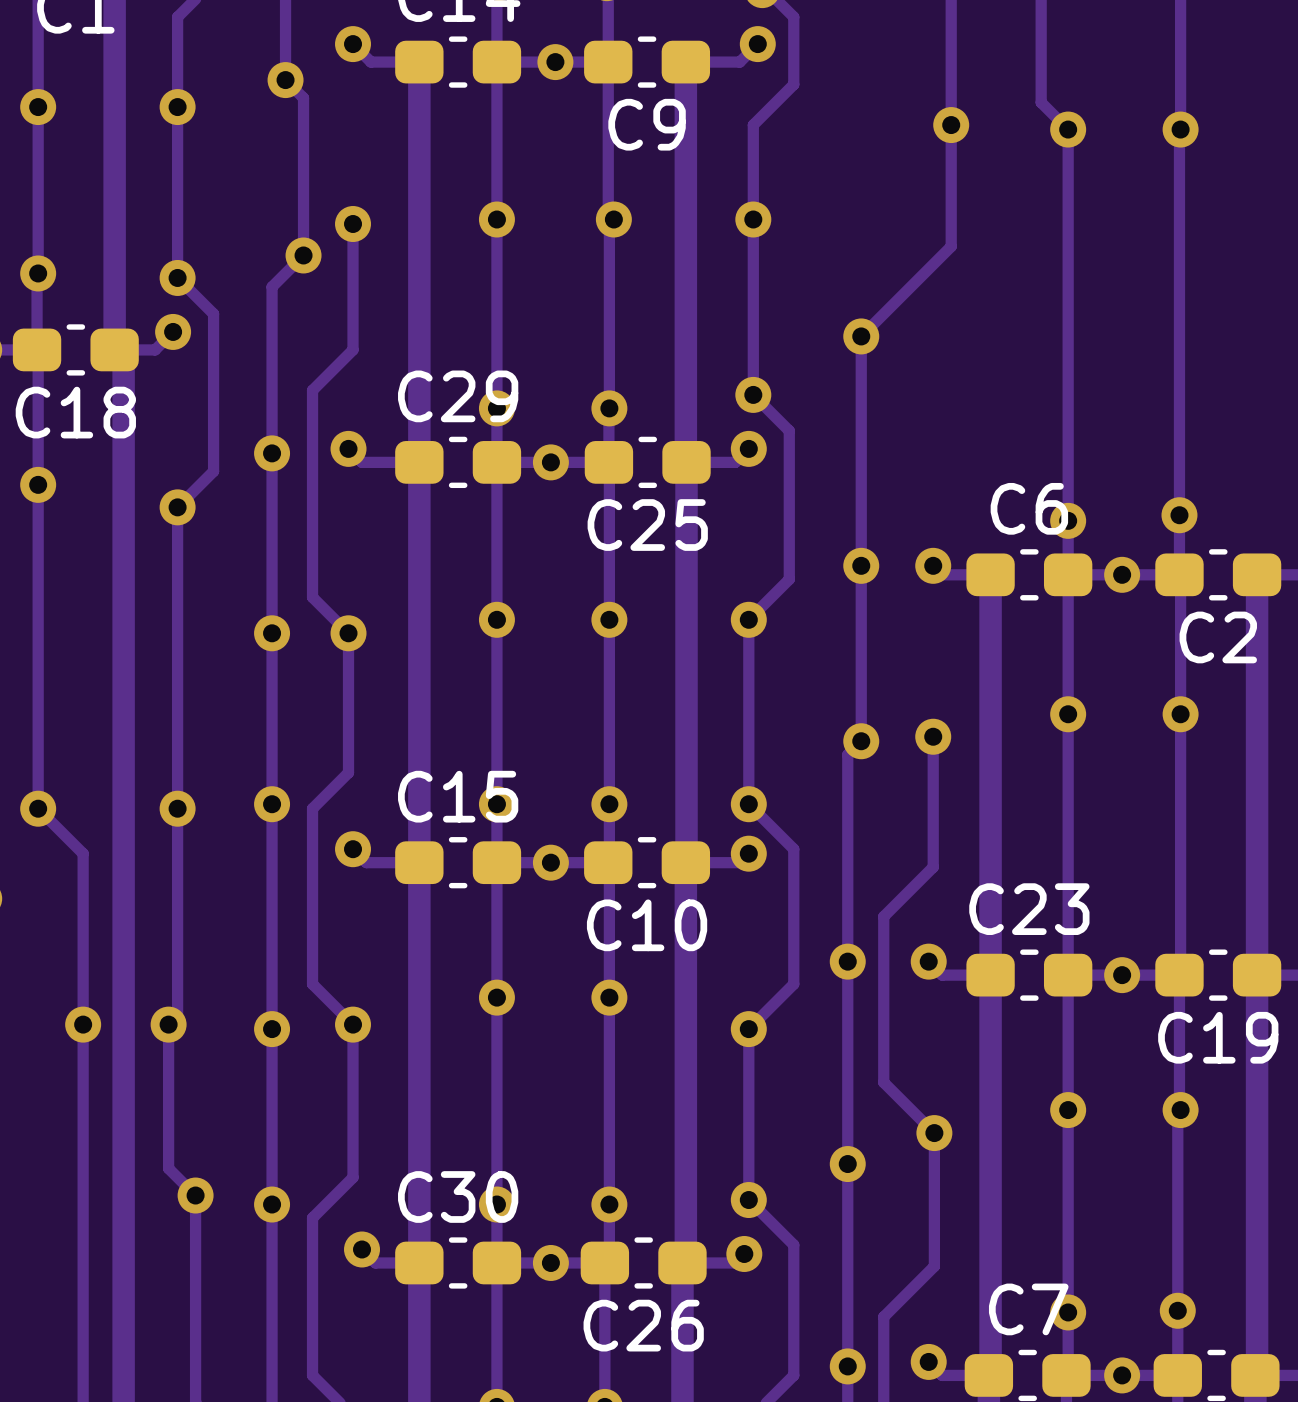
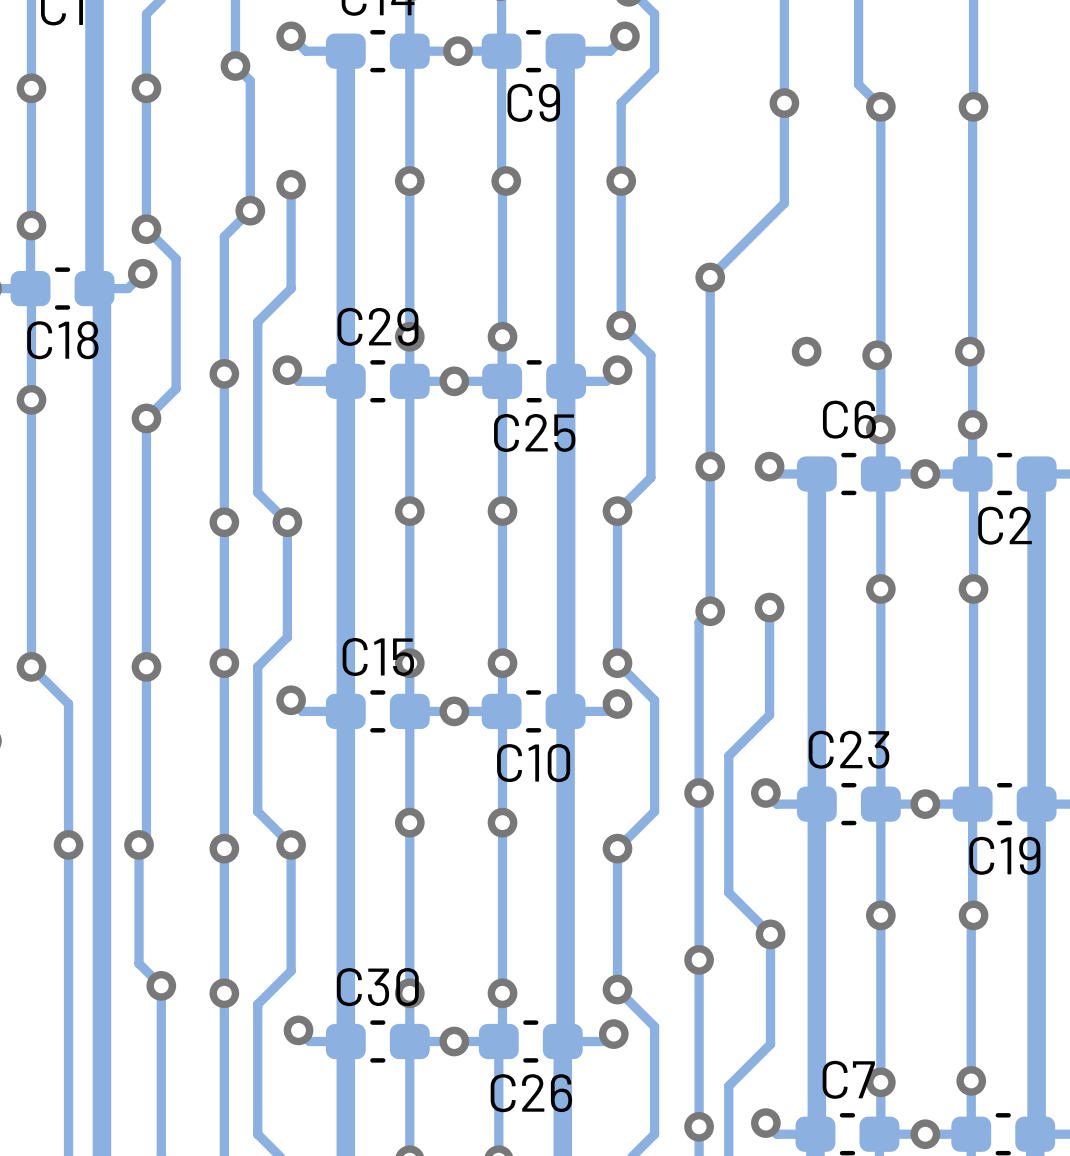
via: none -> (806, 351)
via: none -> (969, 351)
via: none -> (877, 355)

